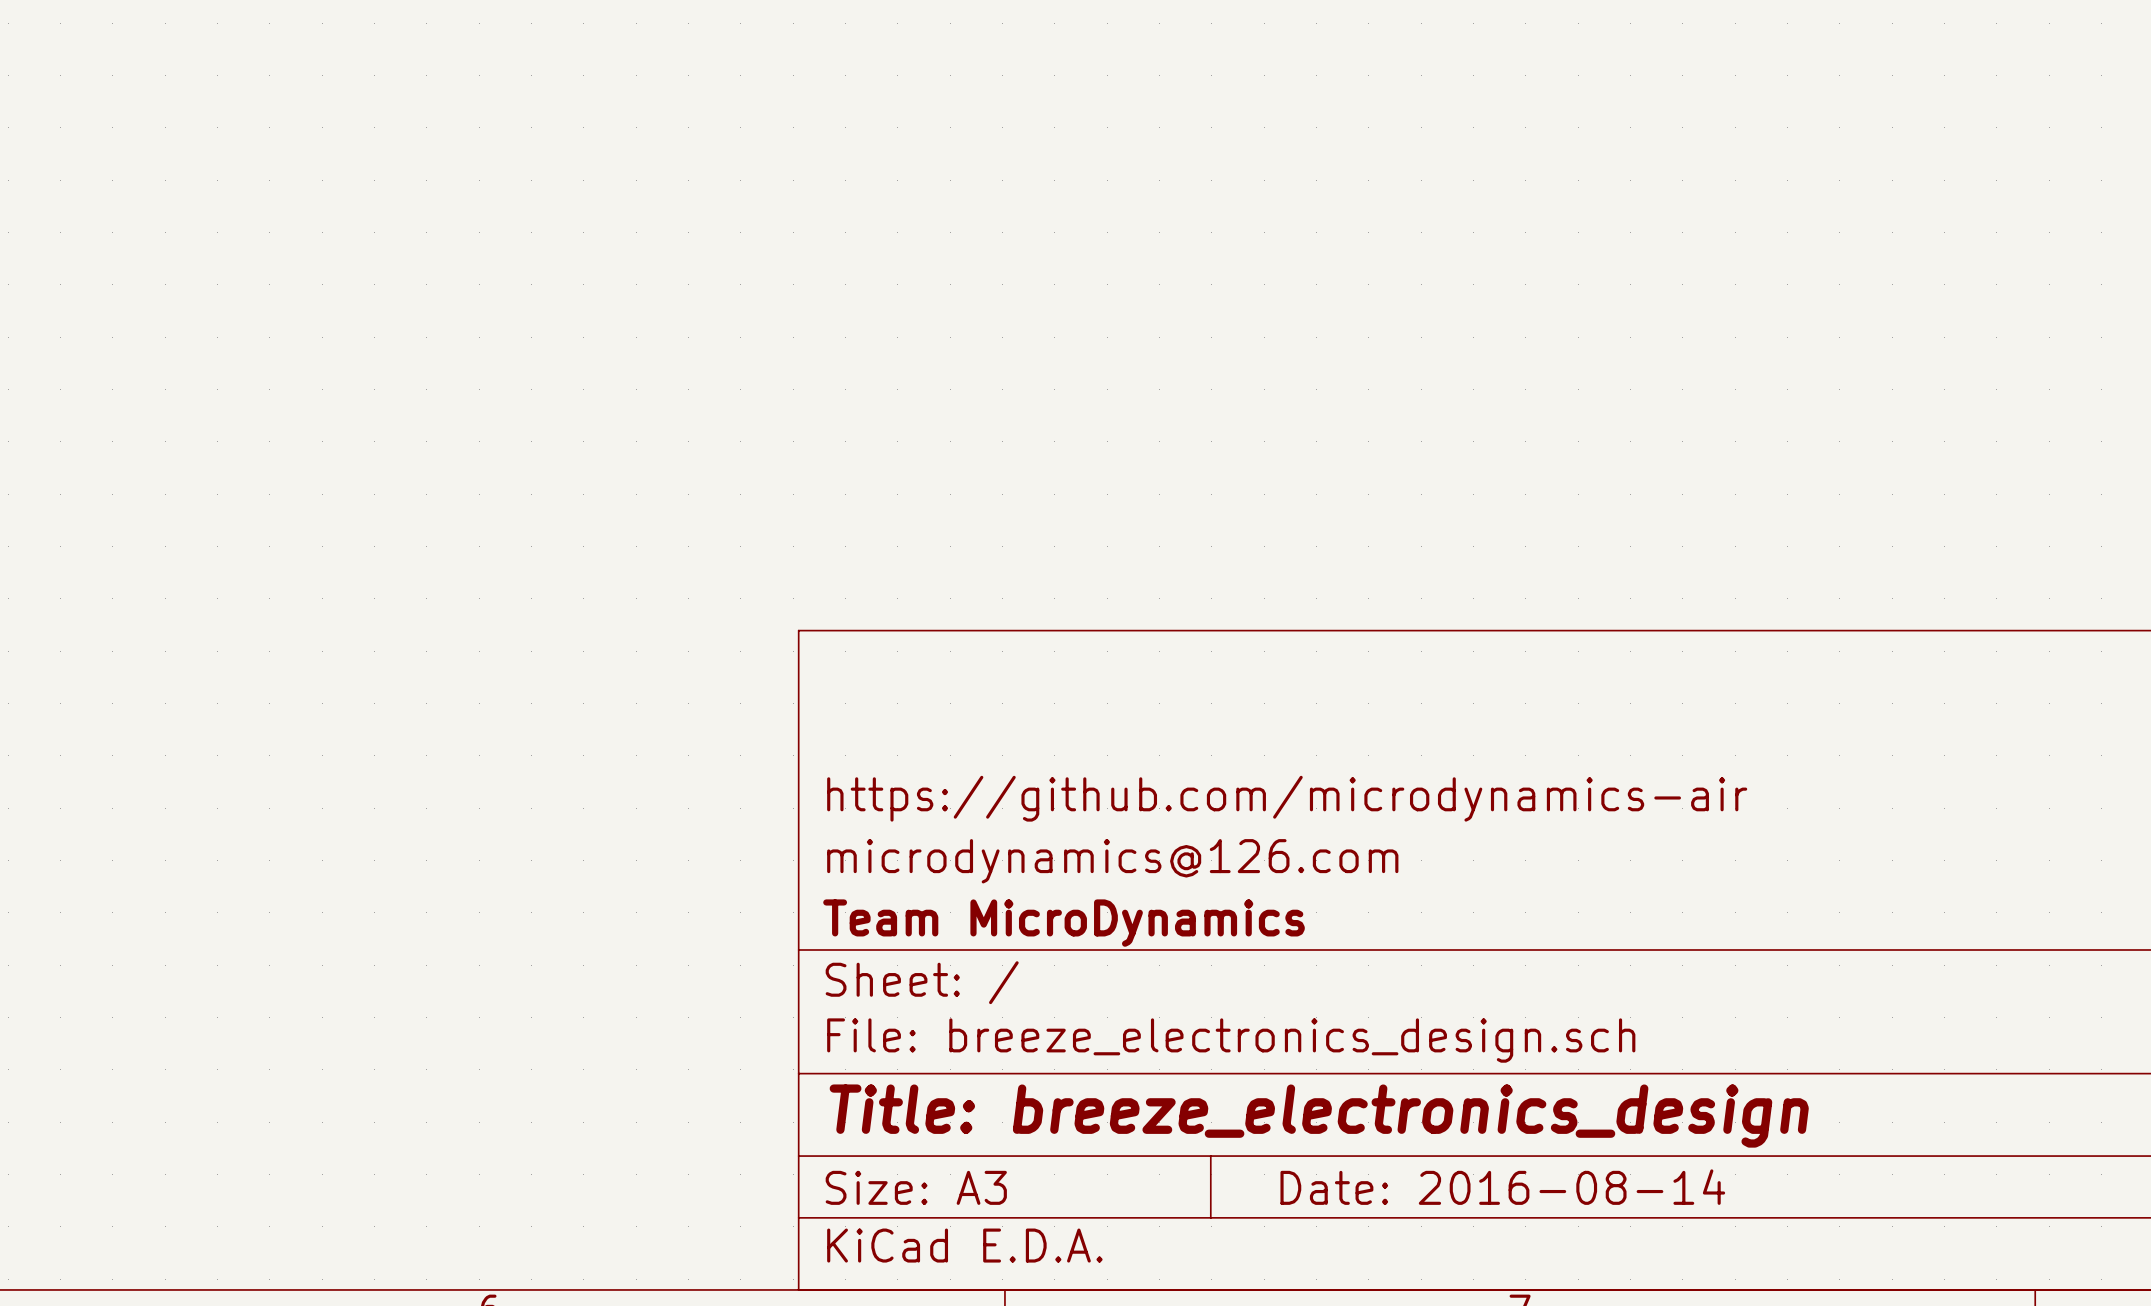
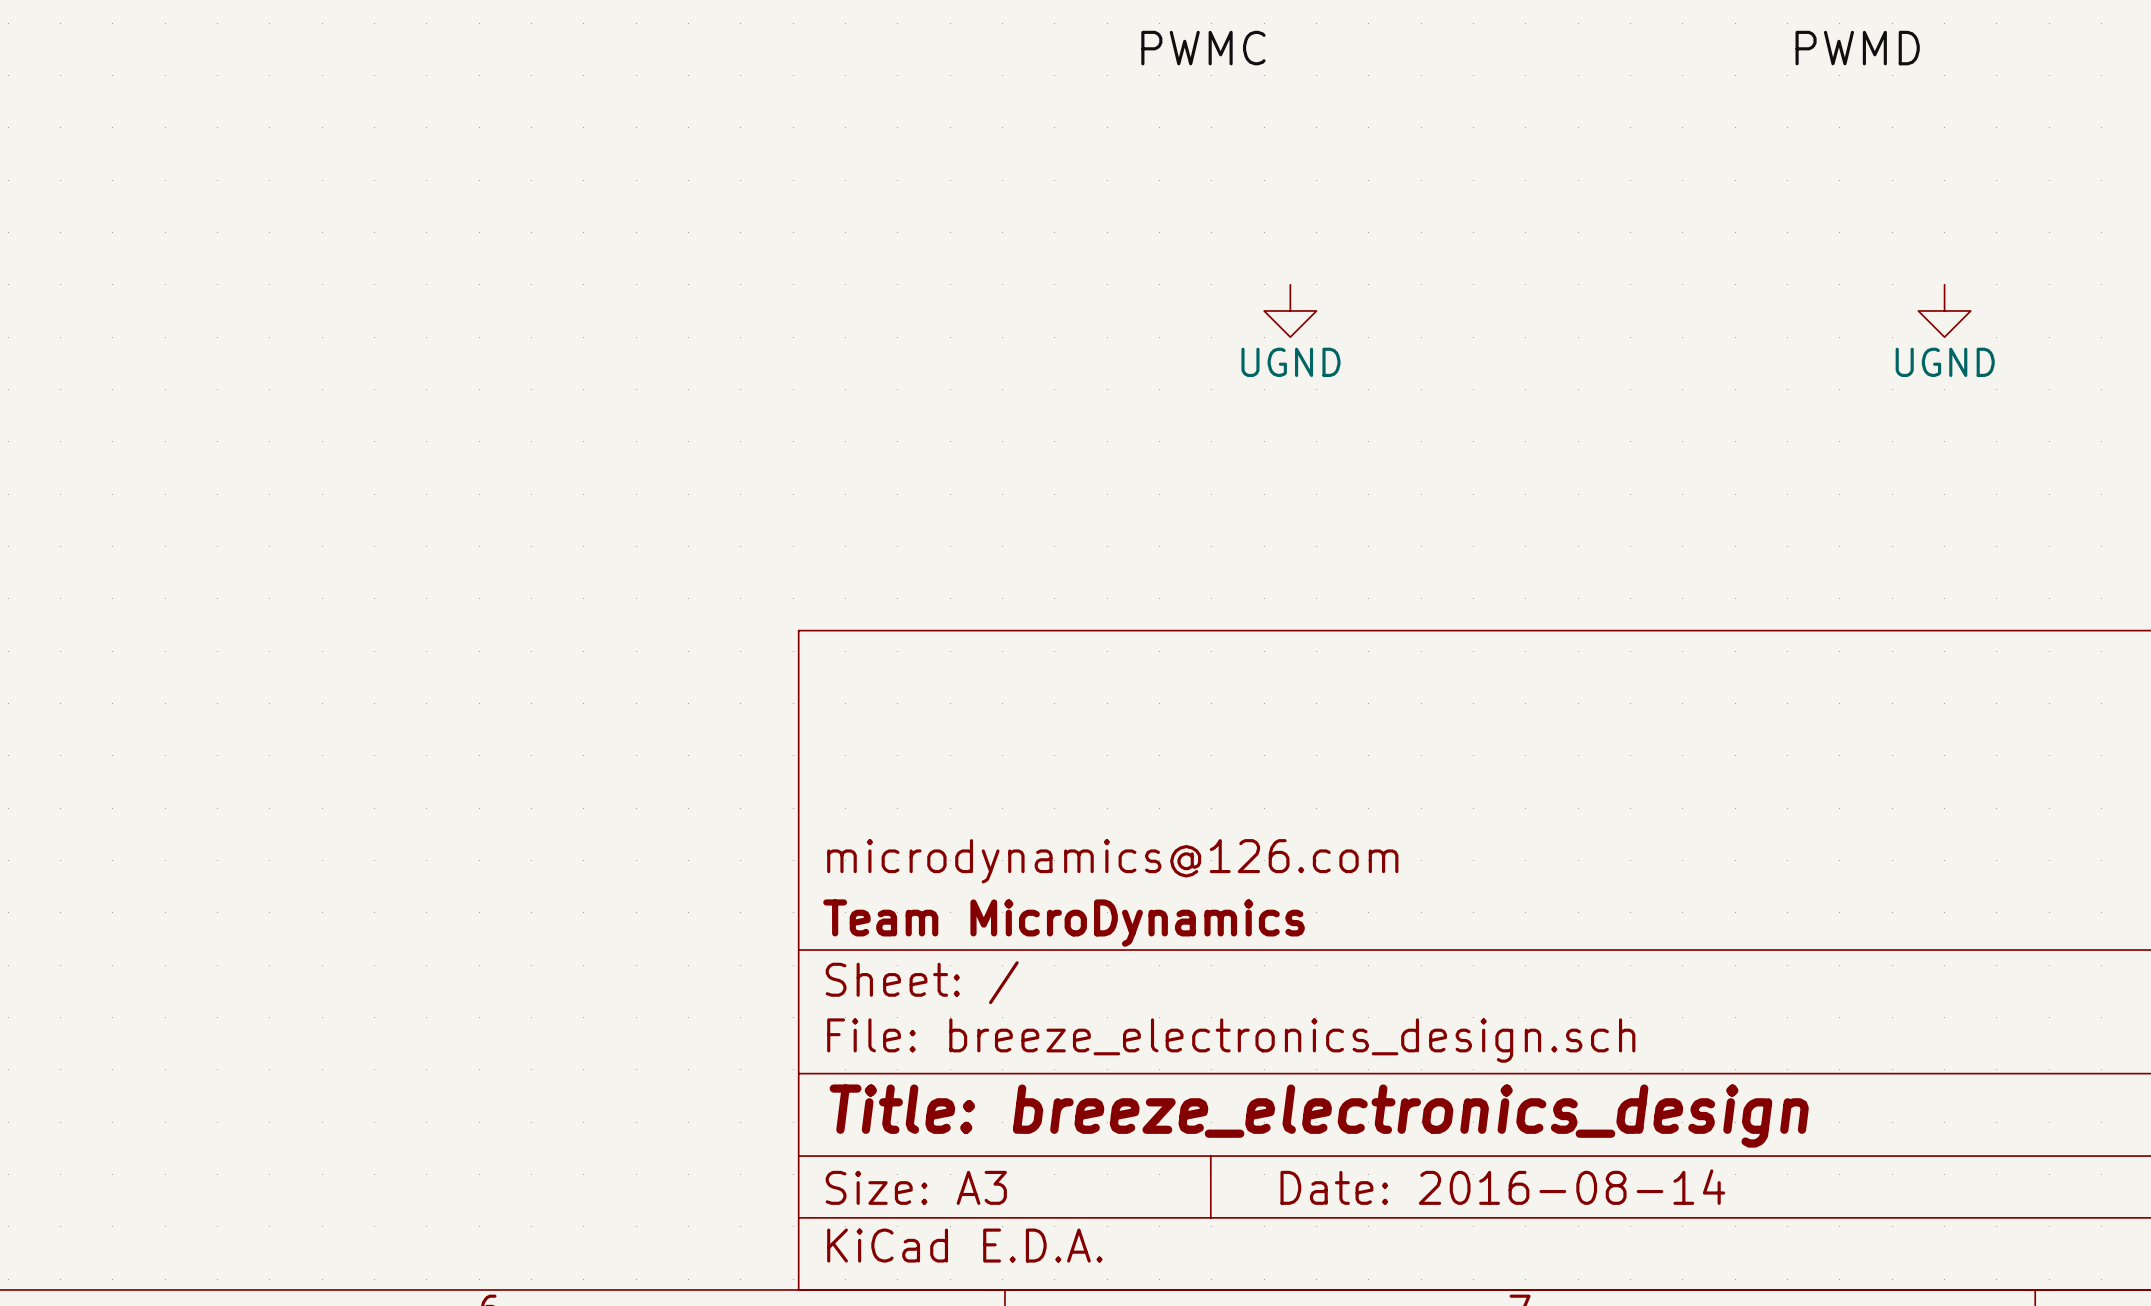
label: none -> PWMC (1203, 48)
label: none -> PWMD (1857, 48)
power symbol: none -> UGND (1290, 310)
power symbol: none -> UGND (1944, 310)
title block: https://github.com/microdynamics-air (1287, 798) -> none

